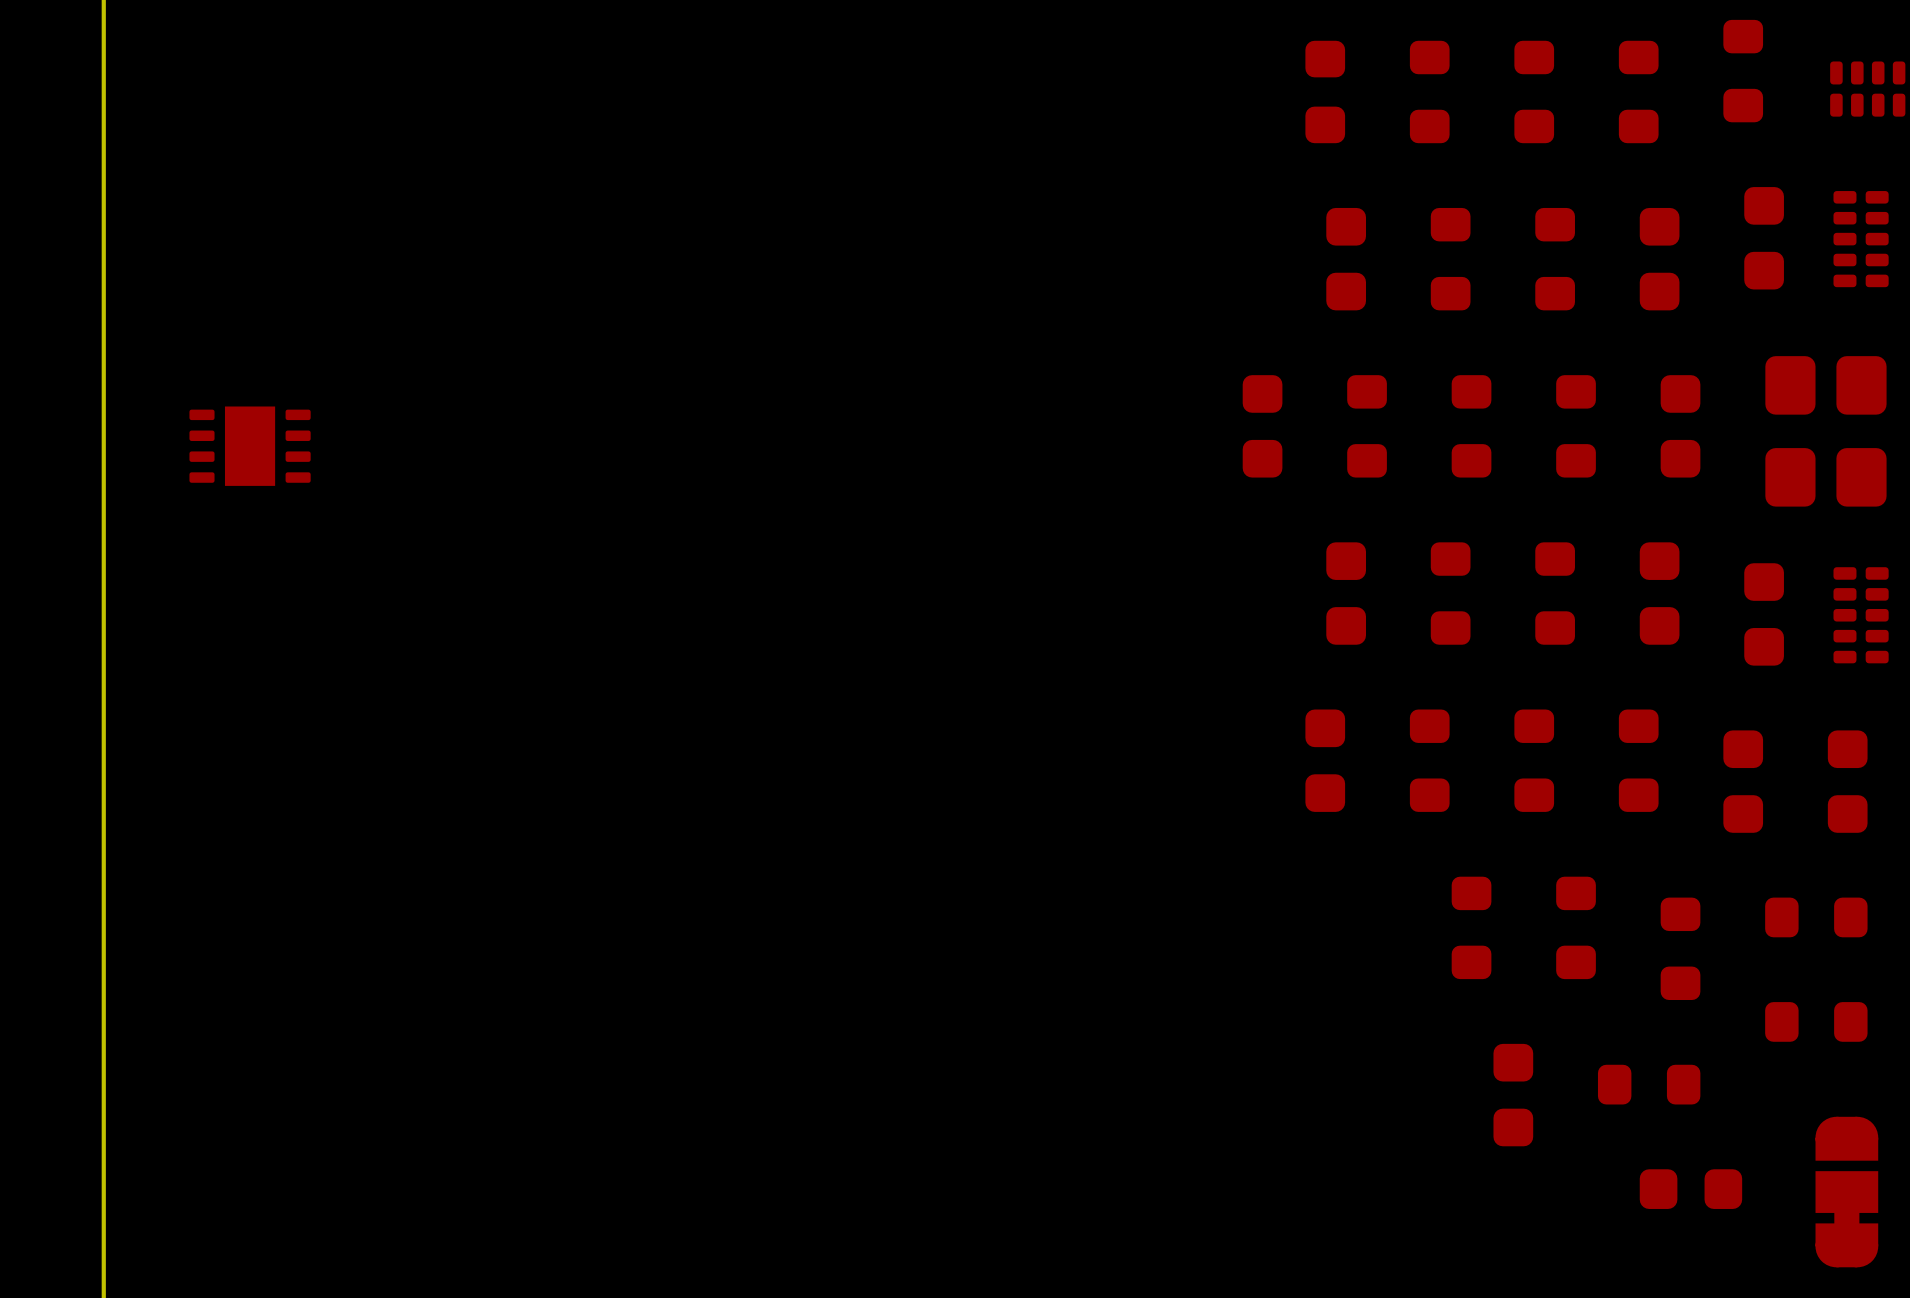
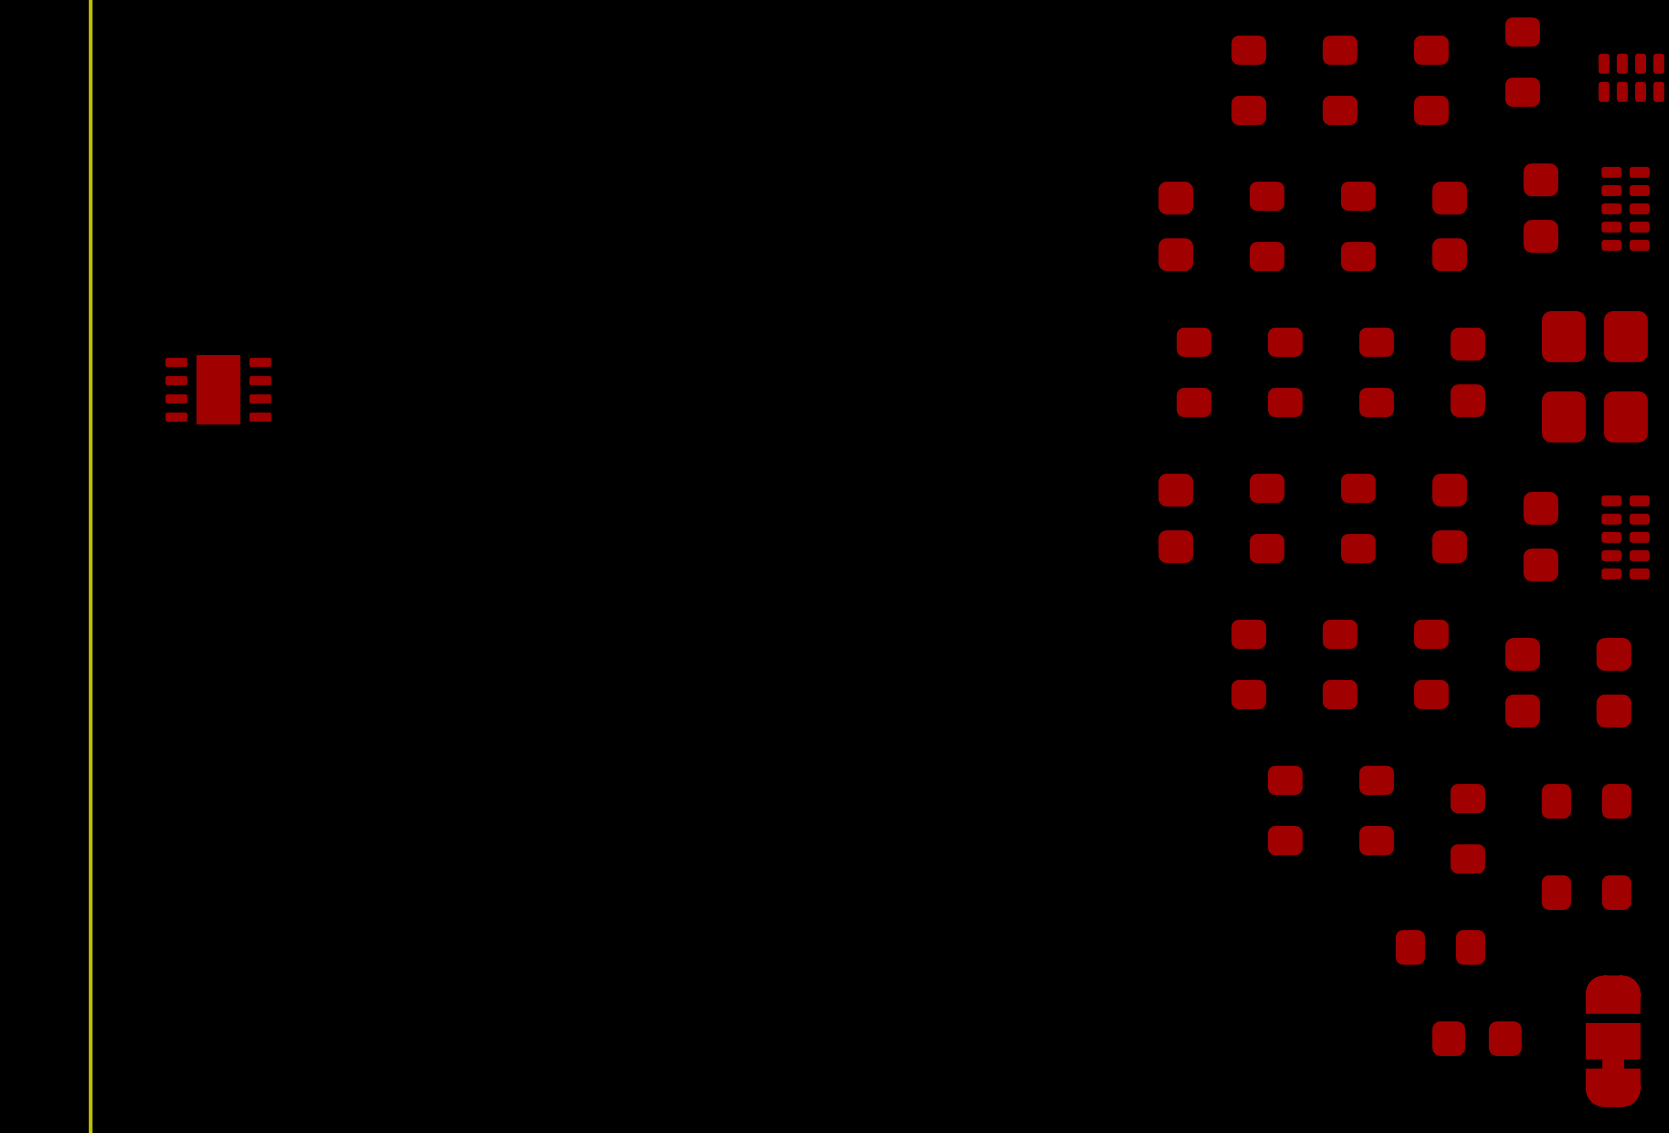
part: (1325, 91) -> none
part: (1262, 426) -> none
part: (1325, 760) -> none
part: (1513, 1095) -> none

